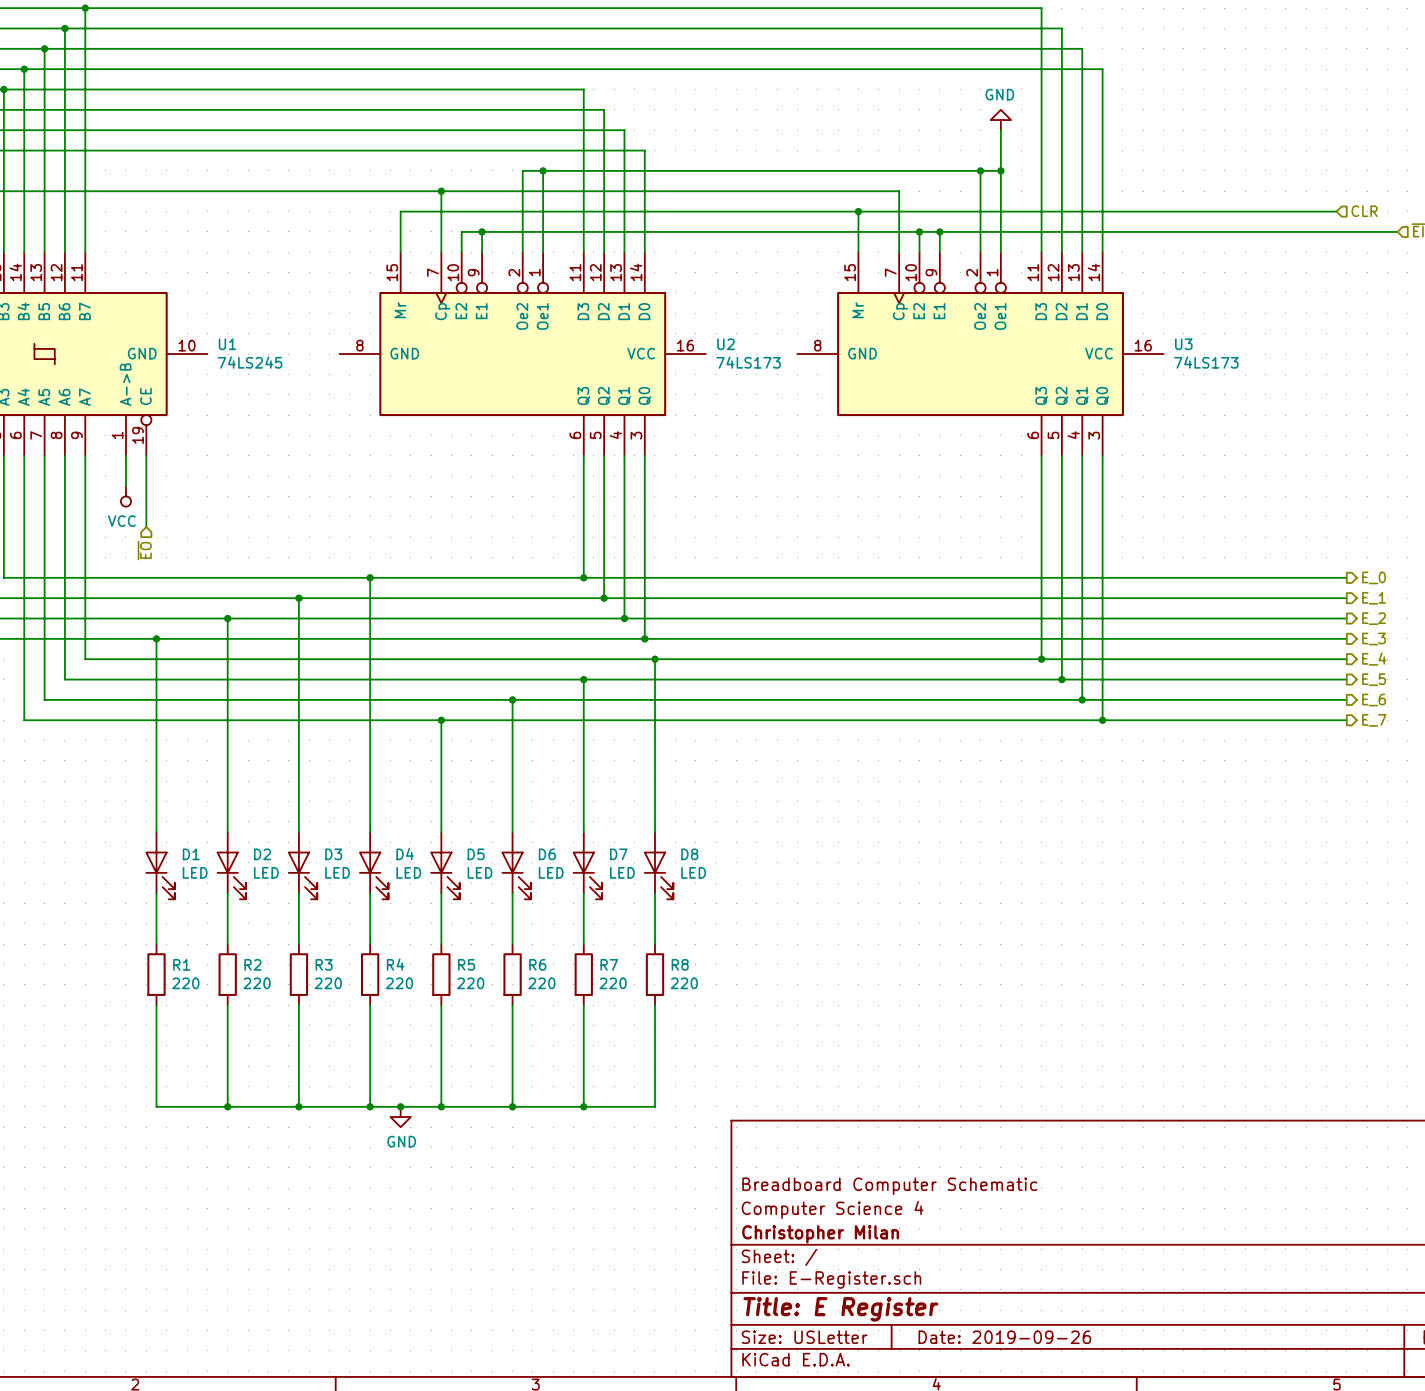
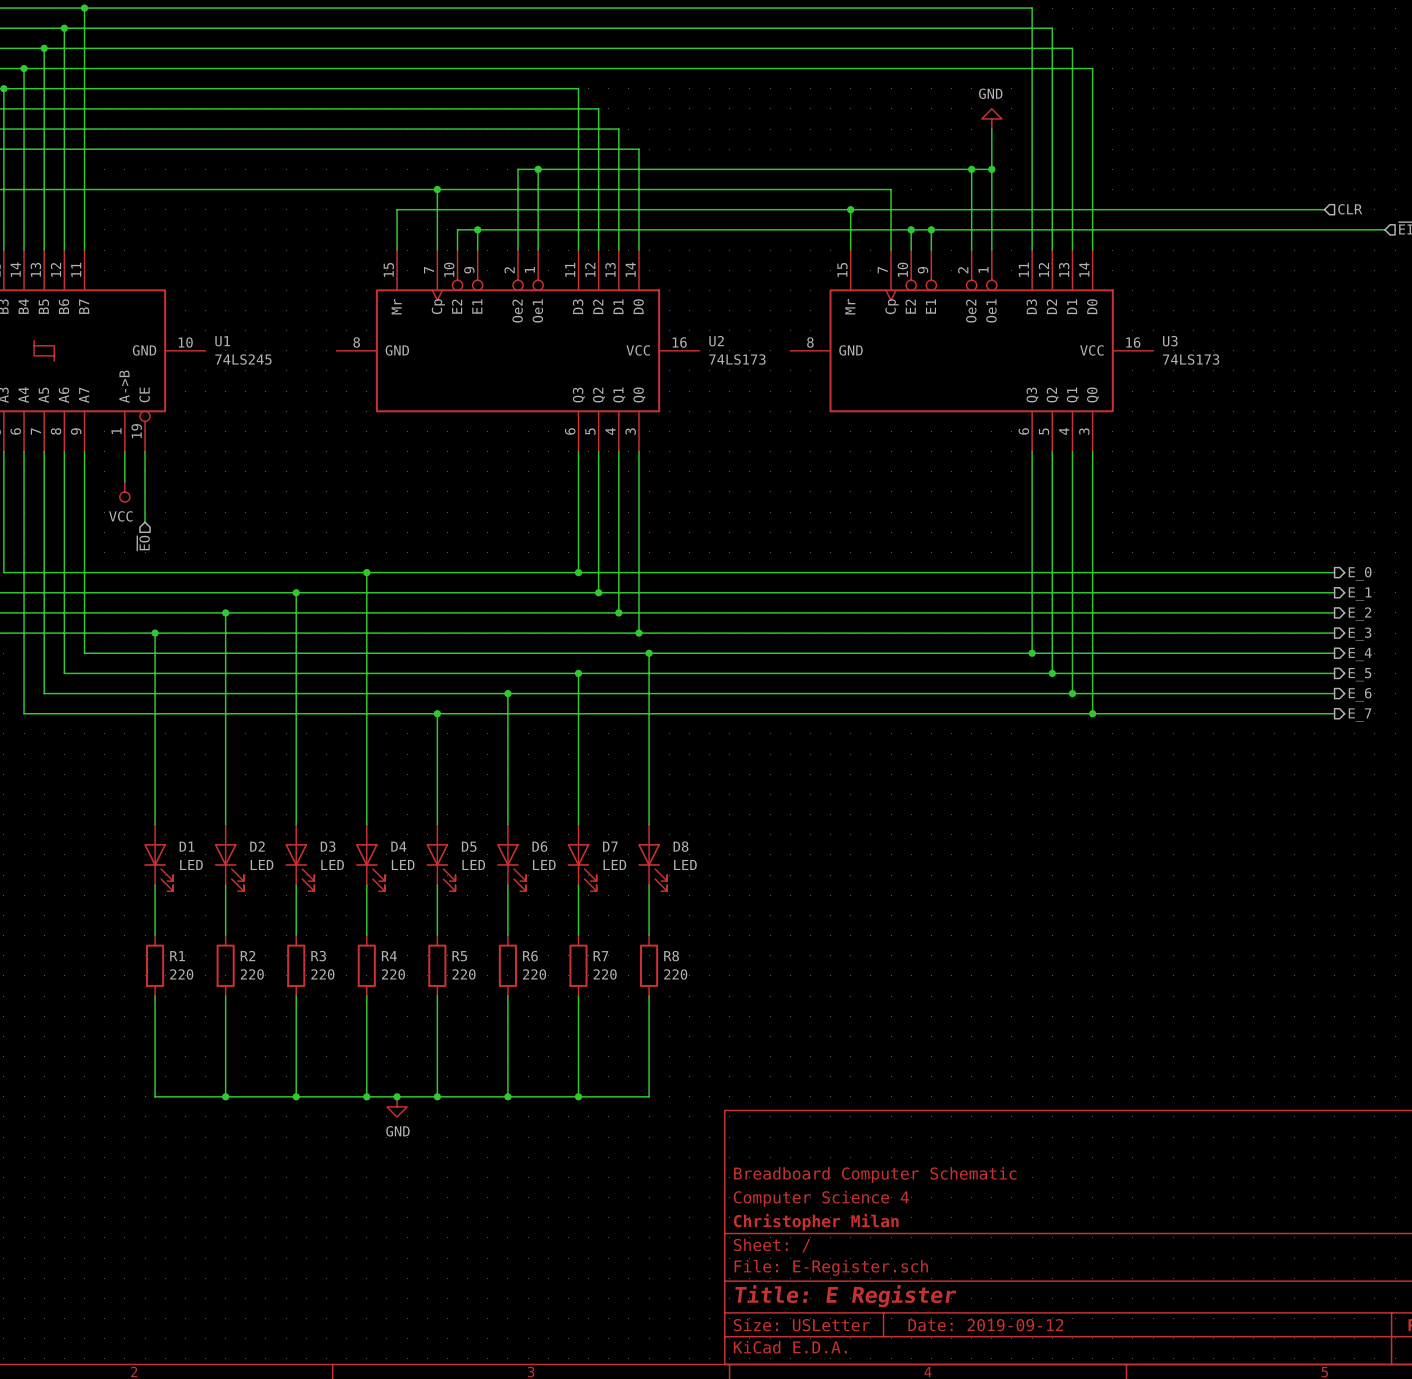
title block: Date: 2019-09-26 (1004, 1337) -> Date: 2019-09-12 (985, 1325)

